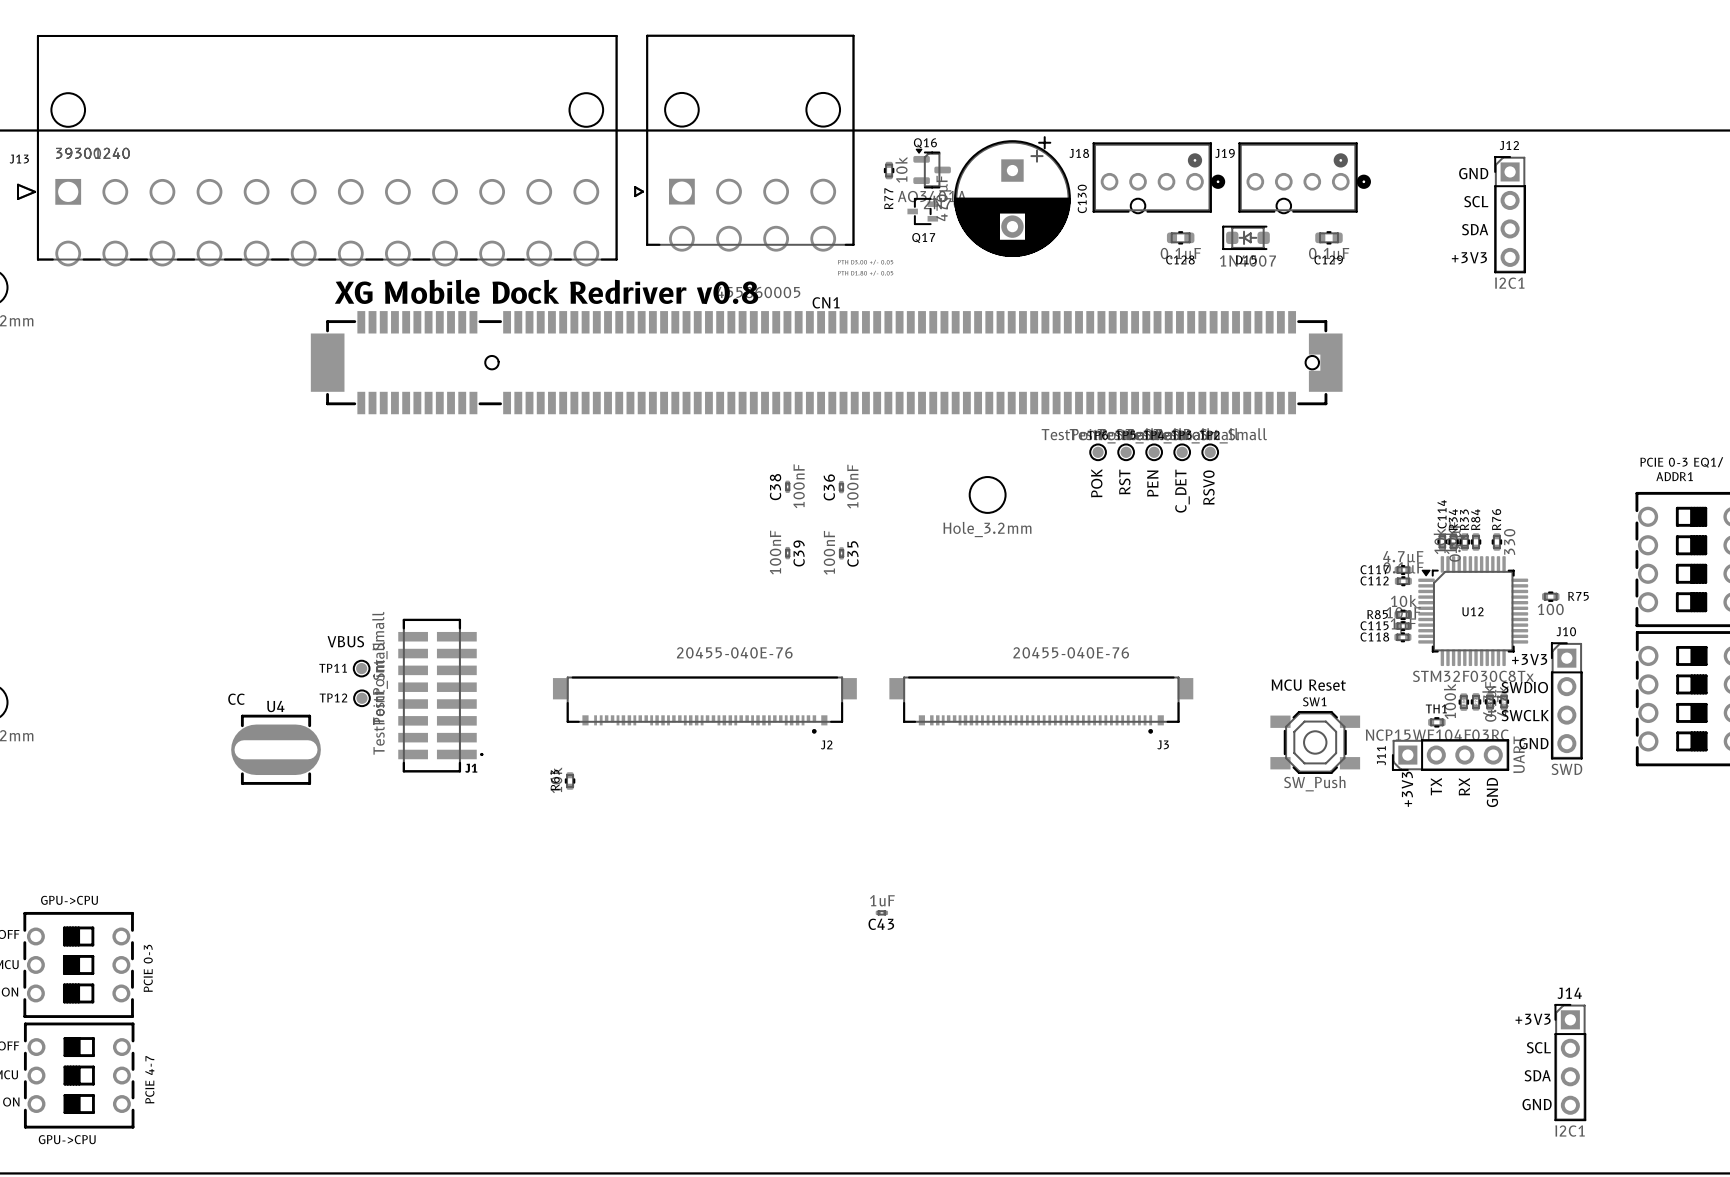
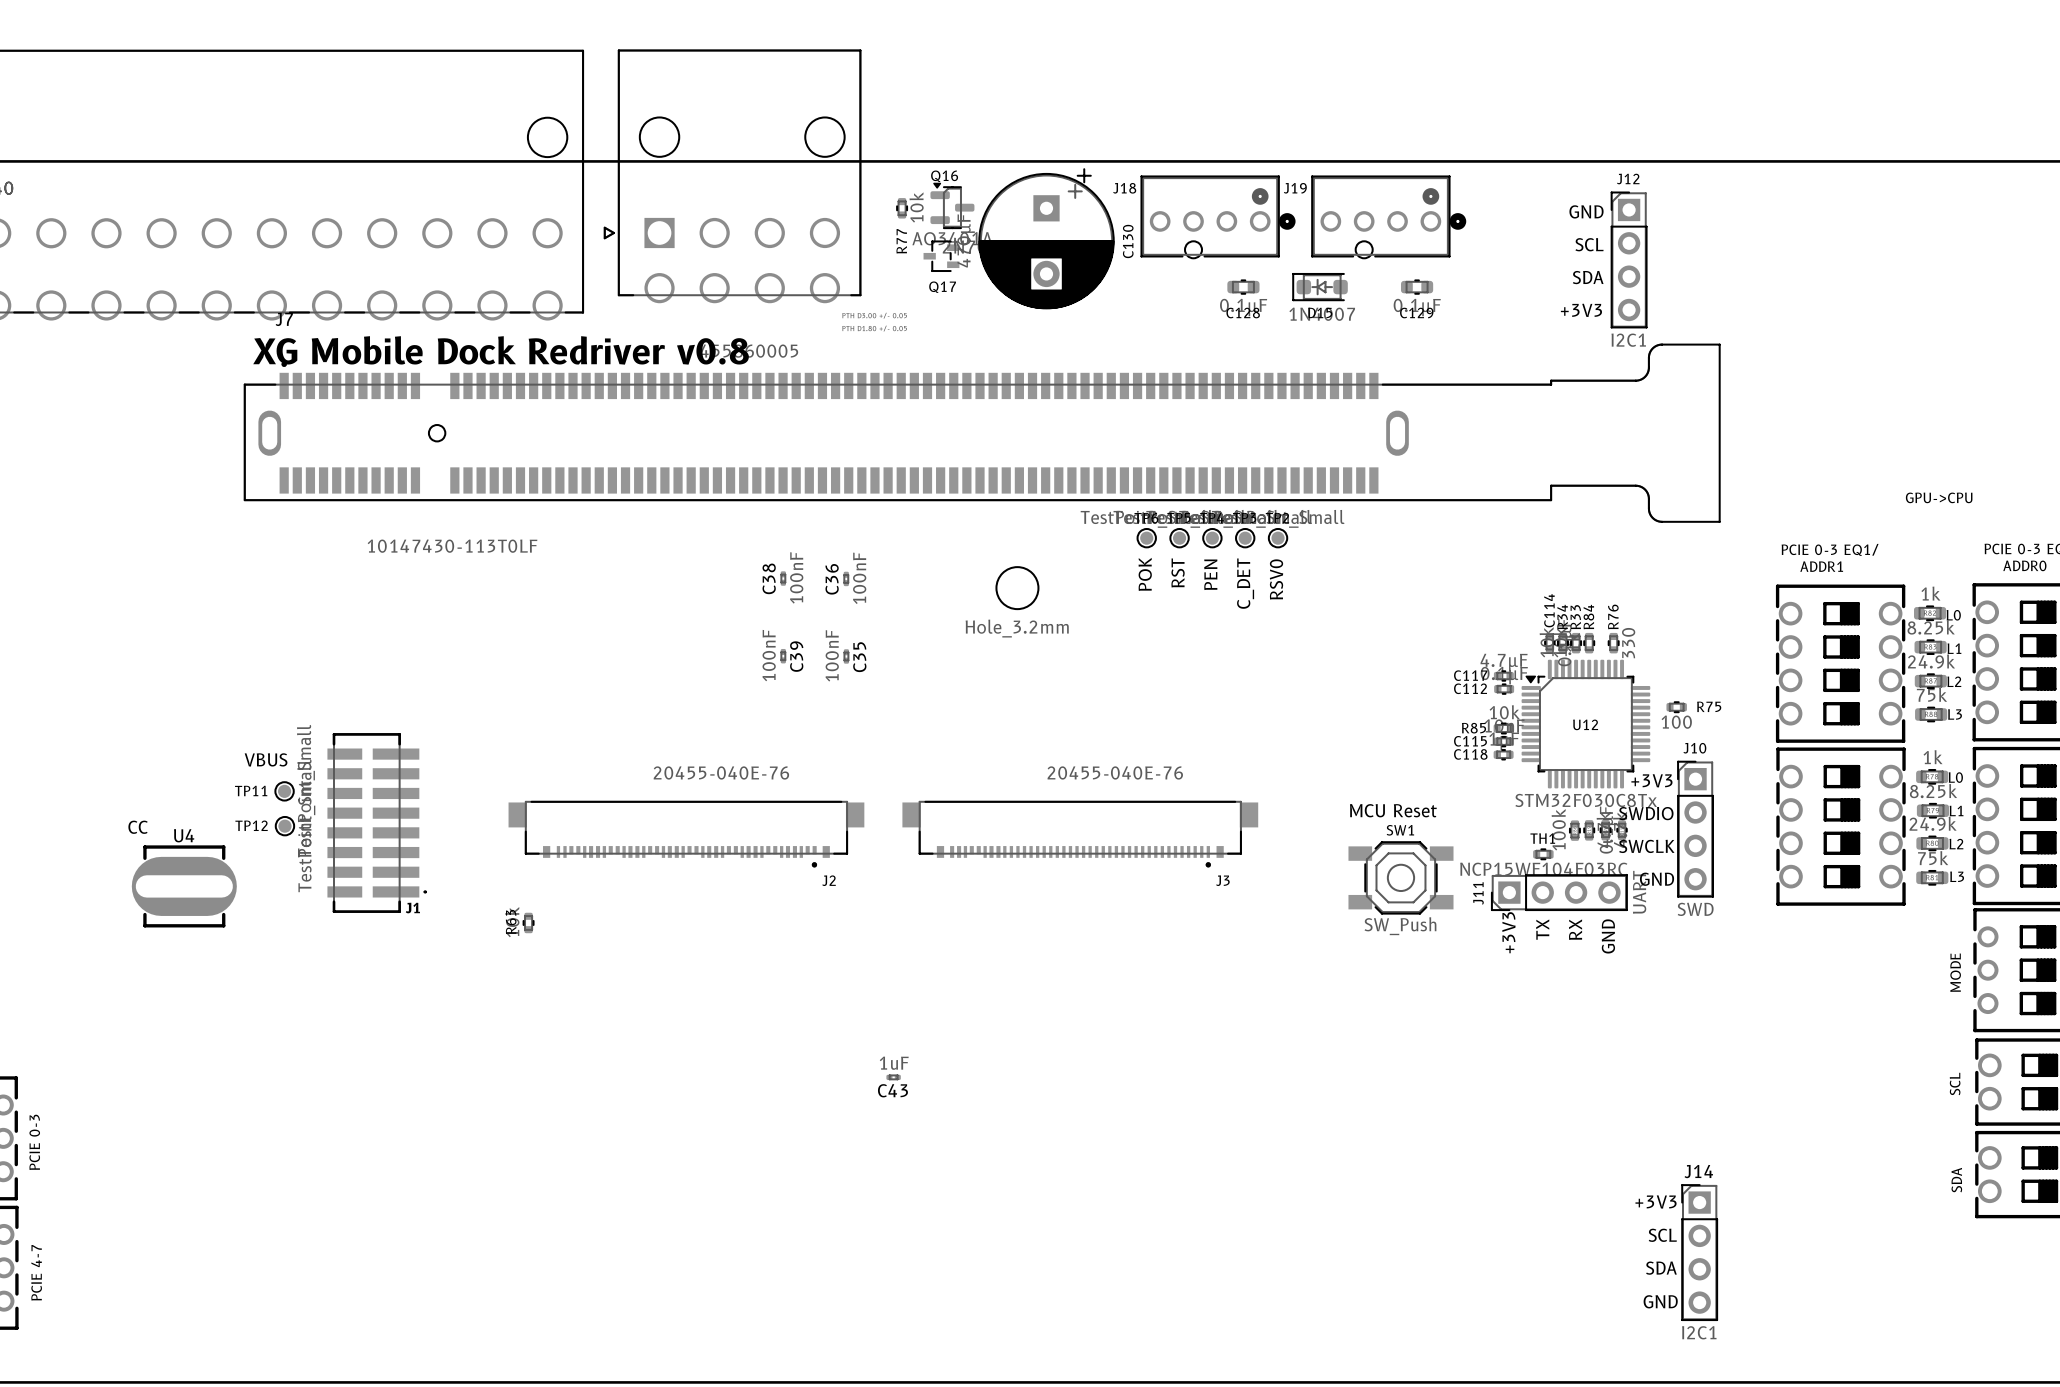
CN1: (826, 362) -> none
J7: none -> 10147430-113T0LF (982, 433)

